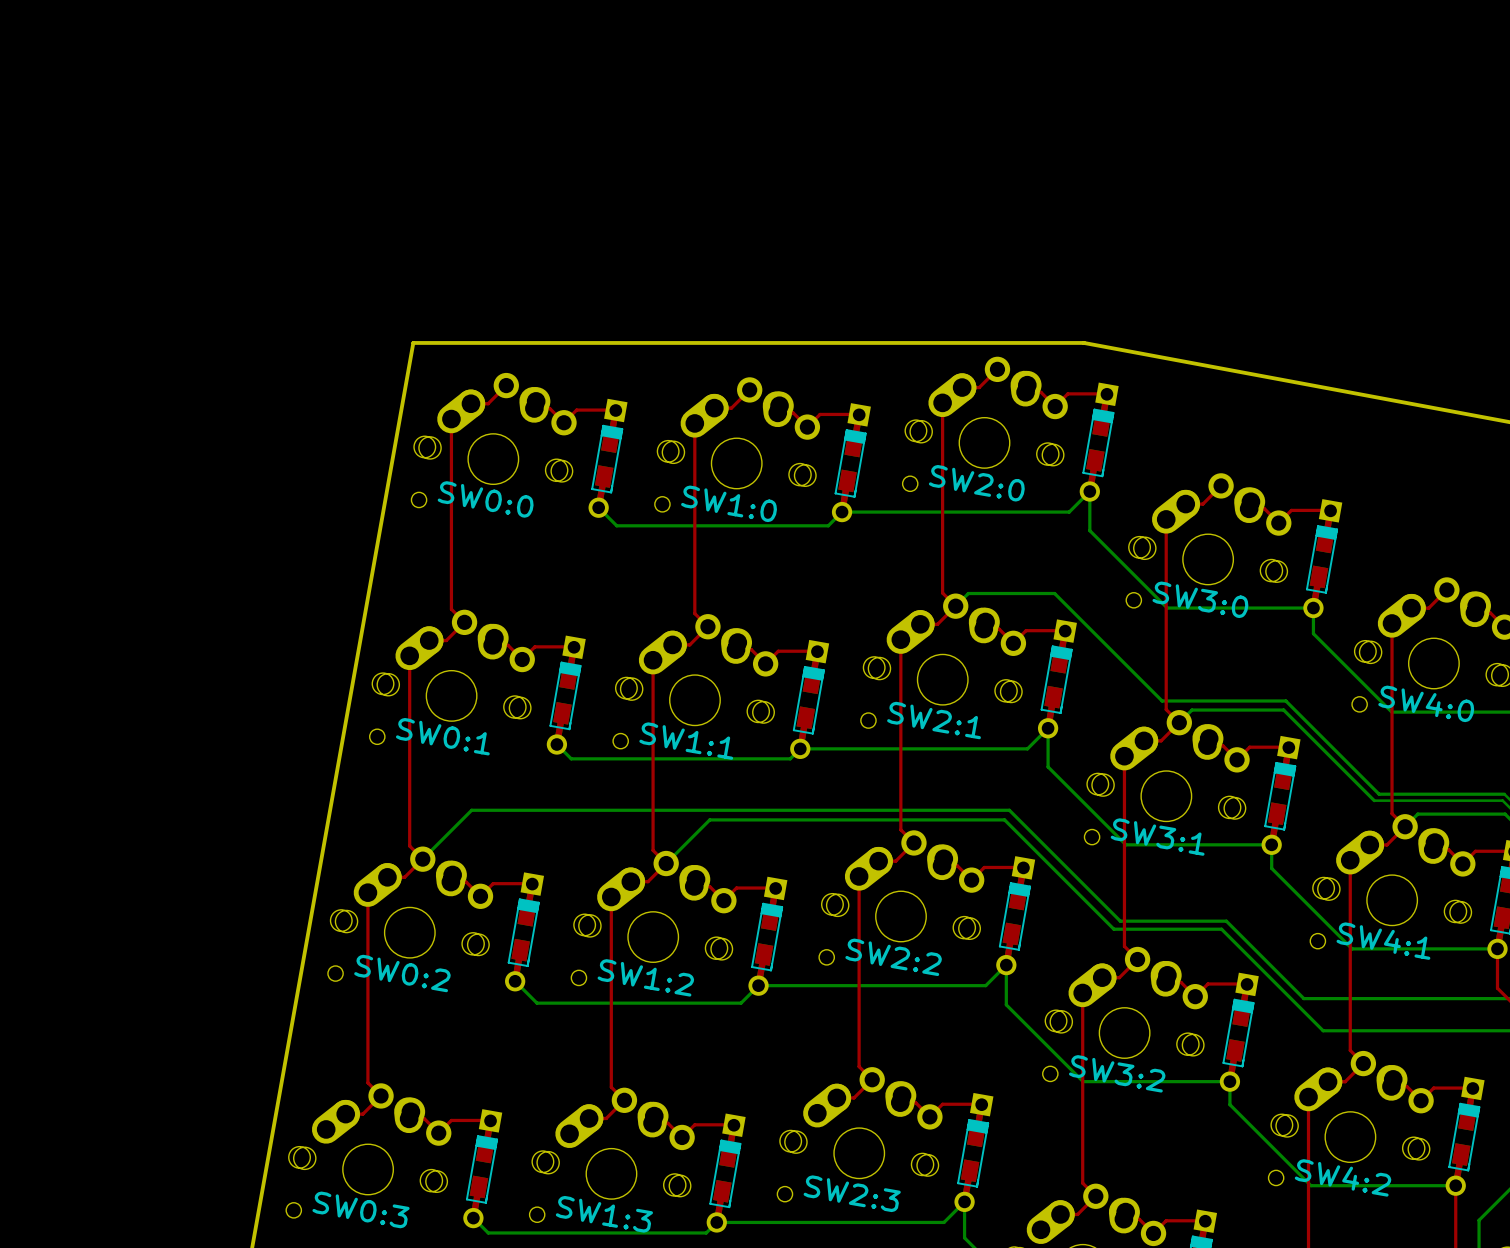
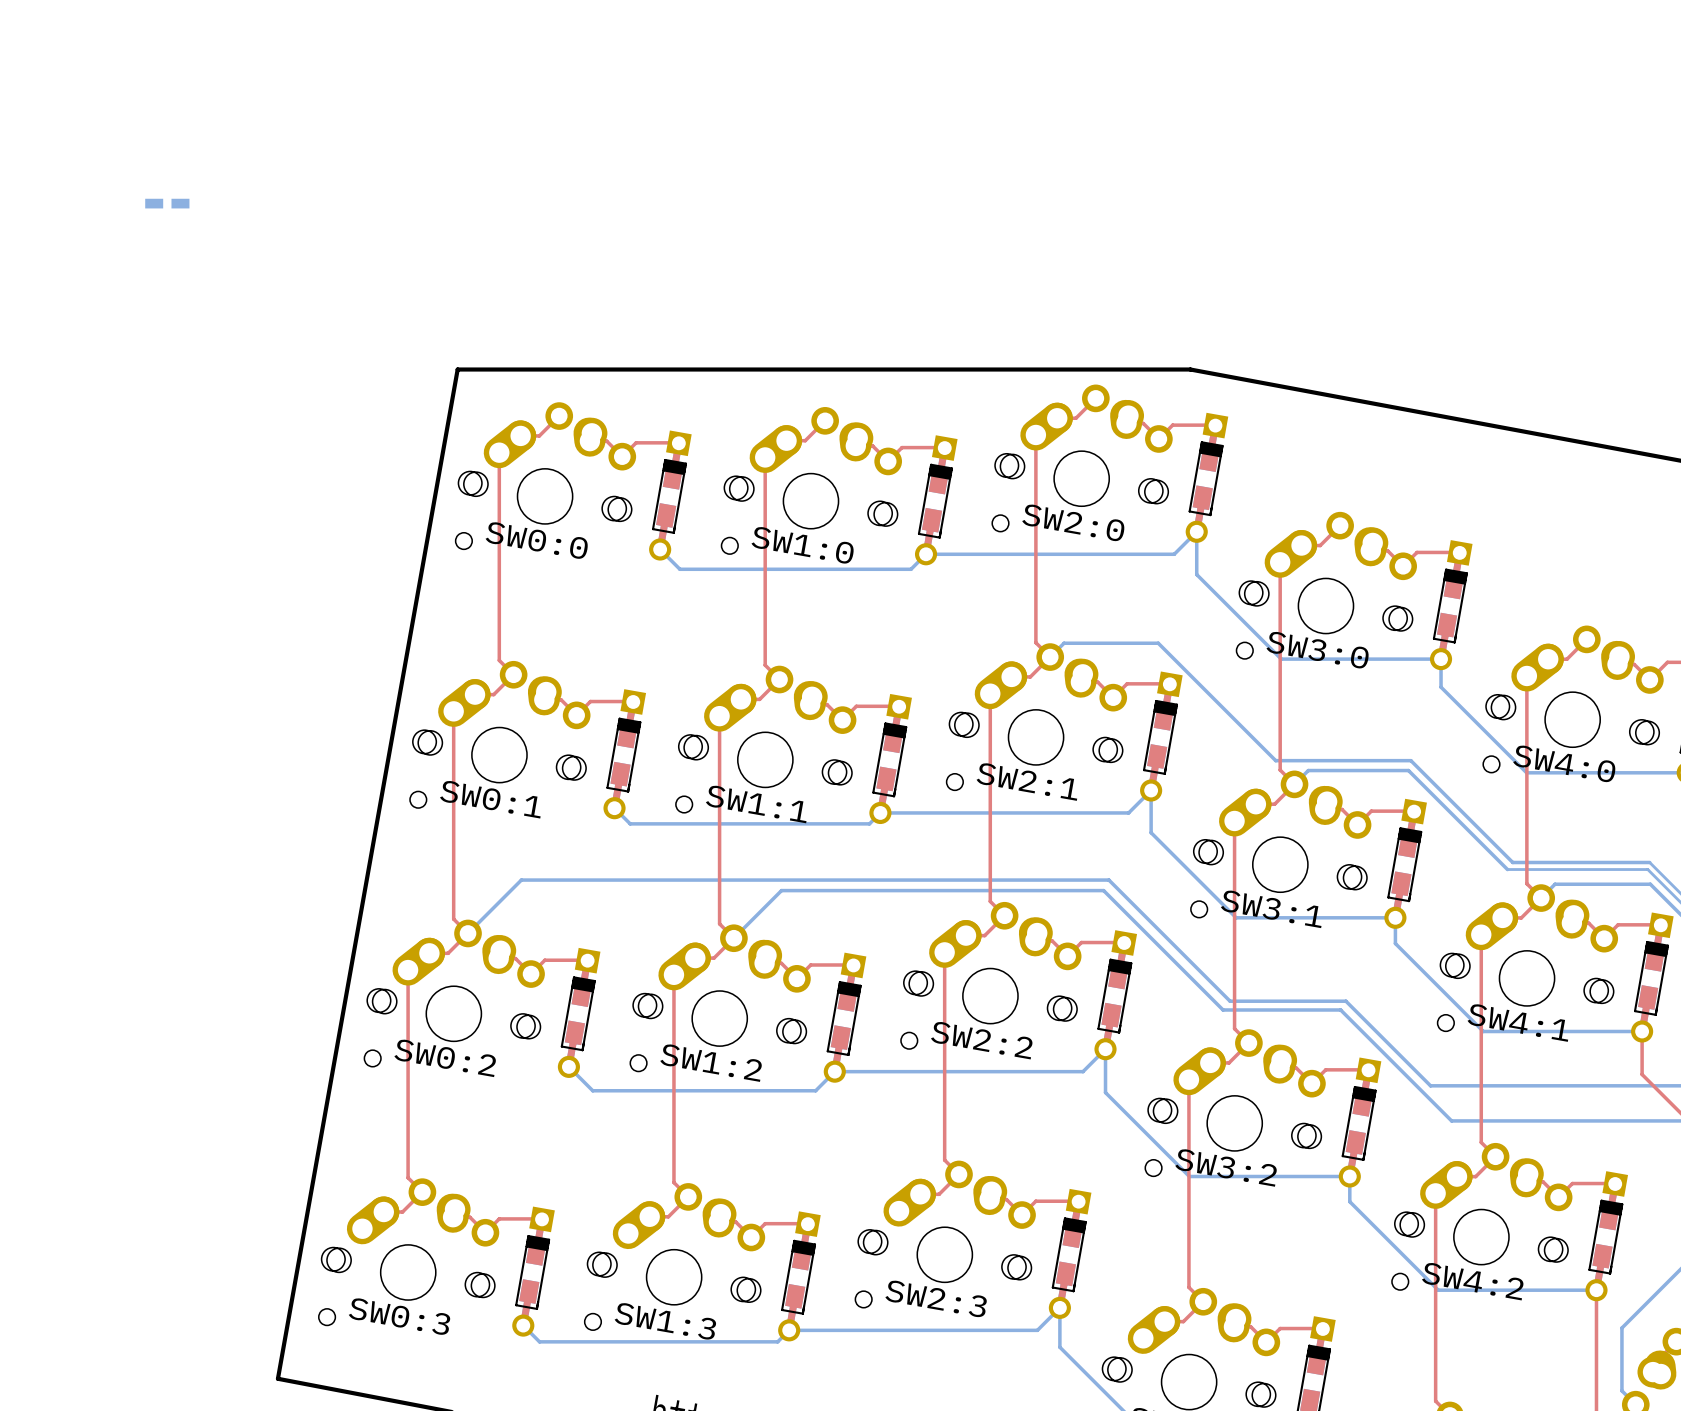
part: none -> (167, 203)

